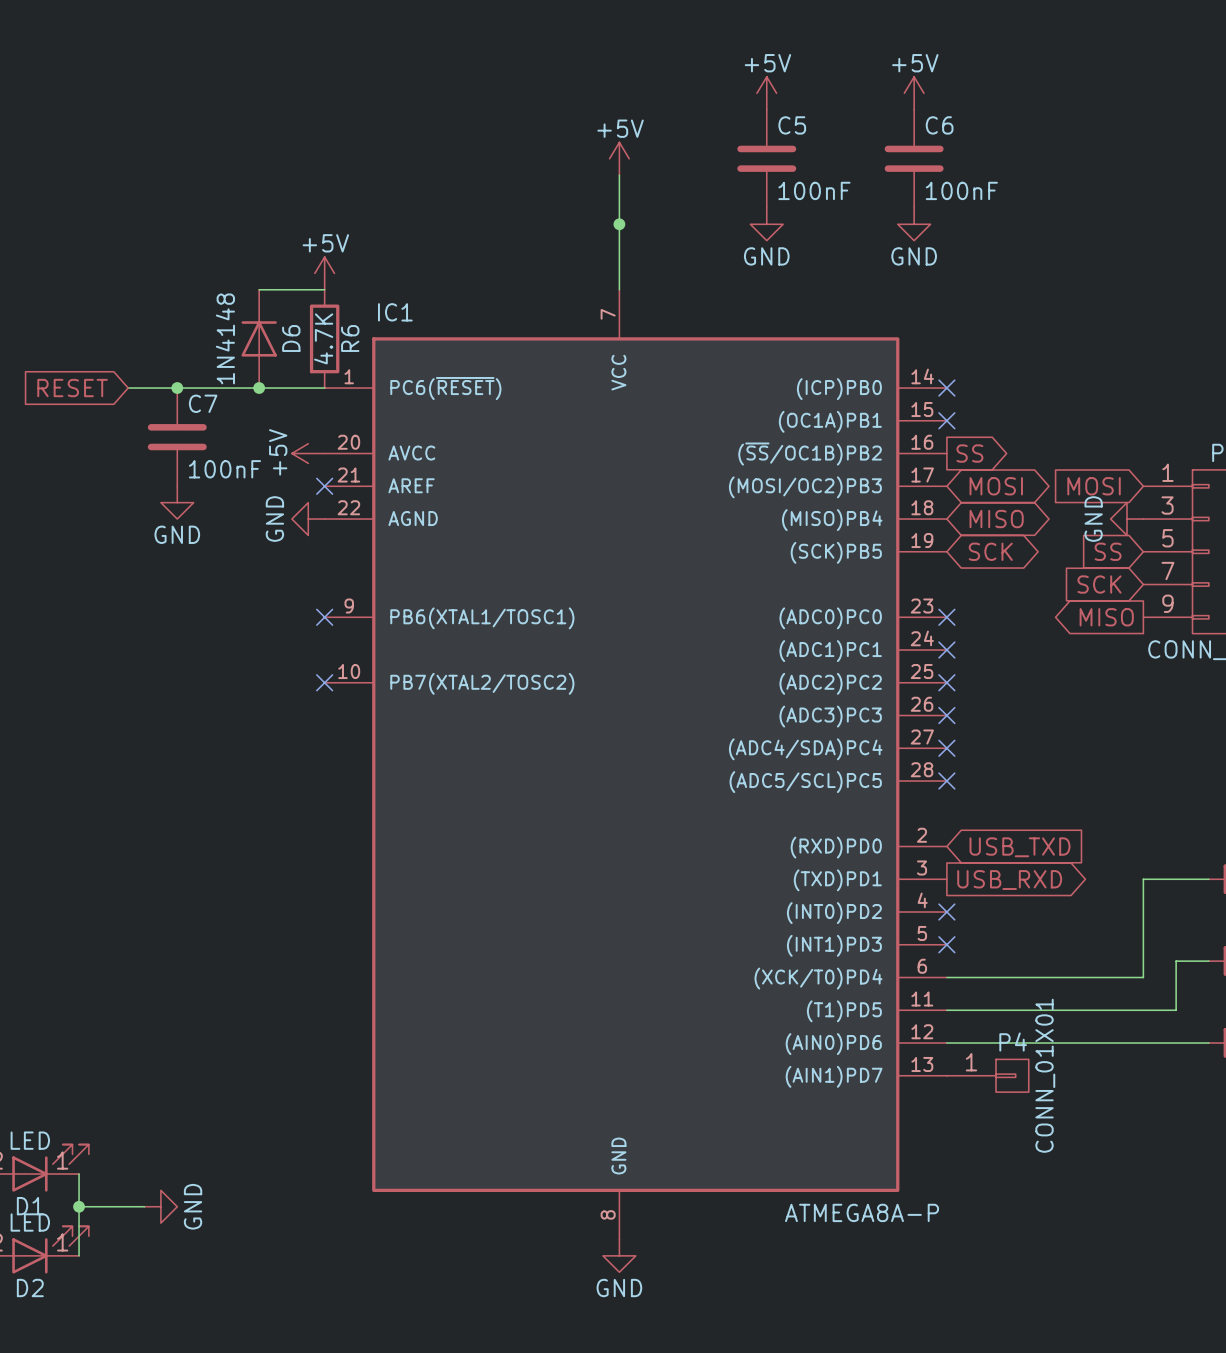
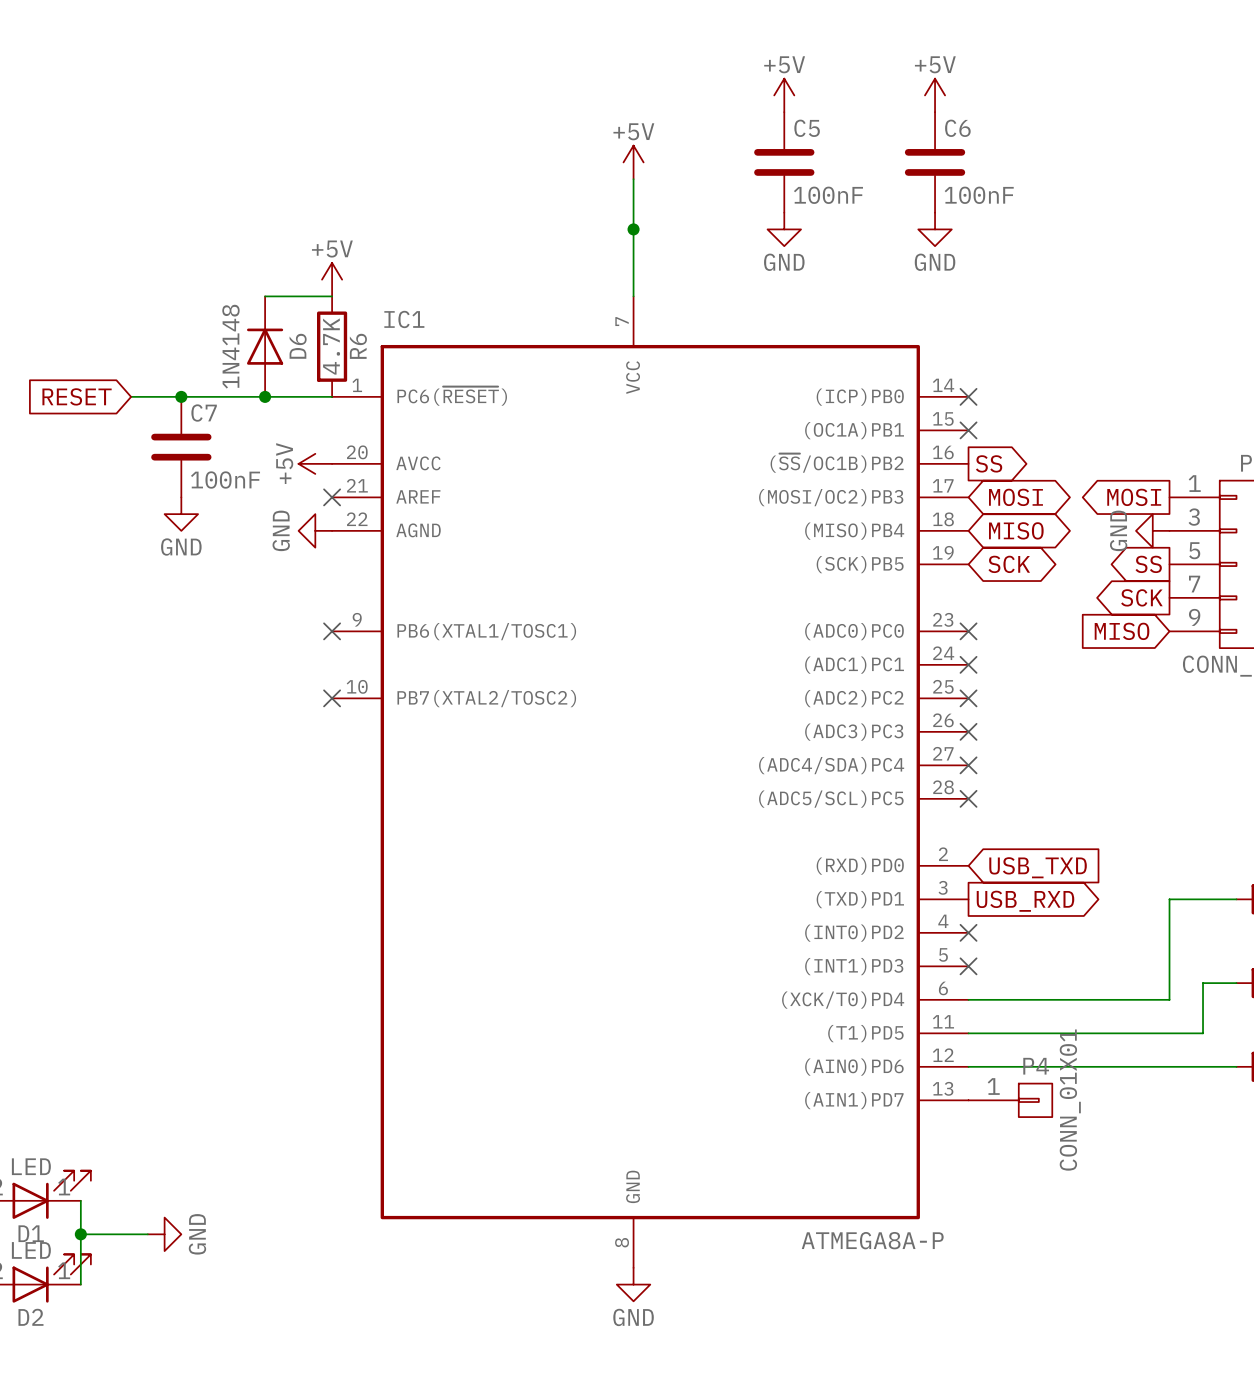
global label shape: input (1094, 486) -> output (1134, 497)
global label shape: input (1108, 551) -> output (1148, 564)
global label shape: input (1099, 584) -> output (1141, 597)
global label shape: output (1106, 617) -> input (1122, 631)

